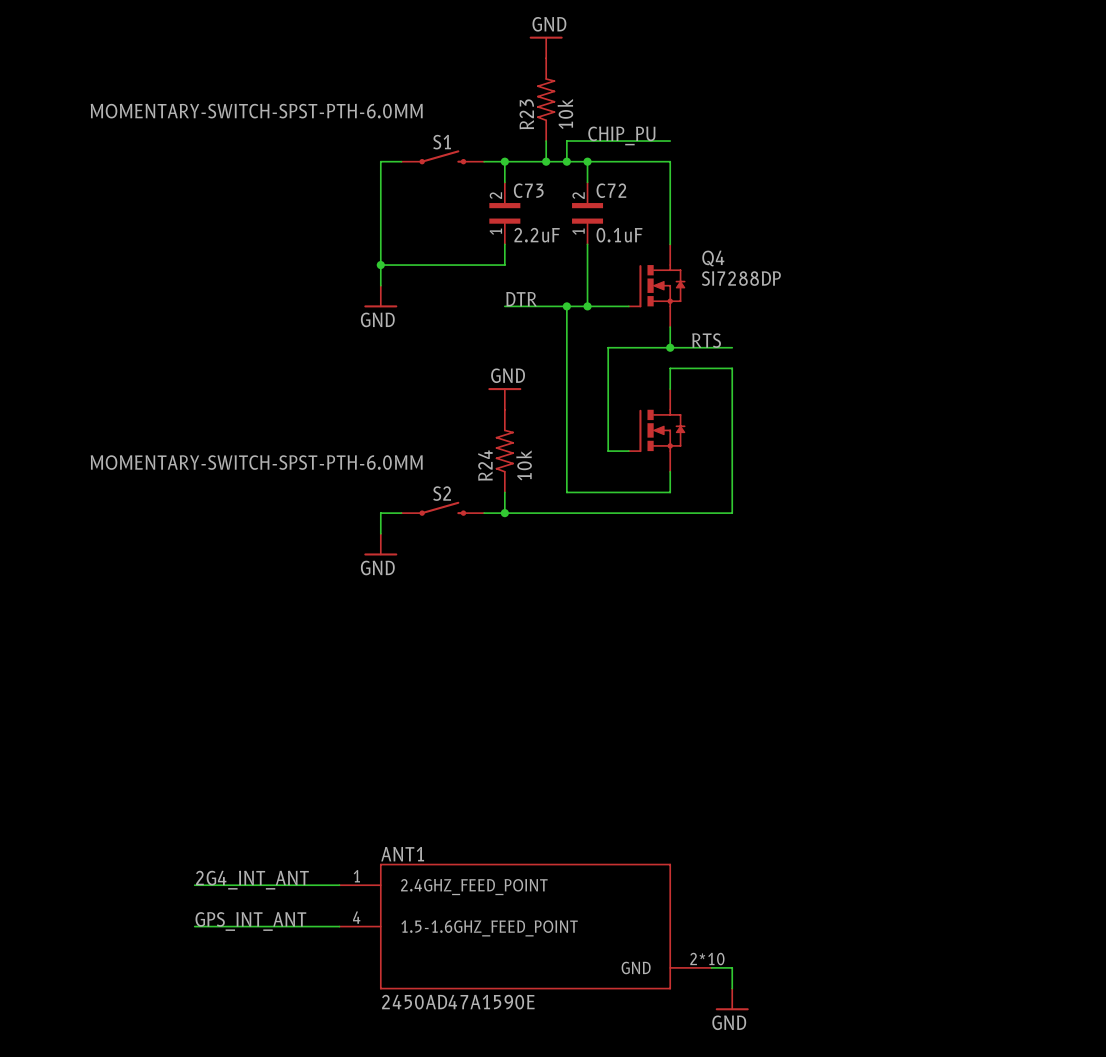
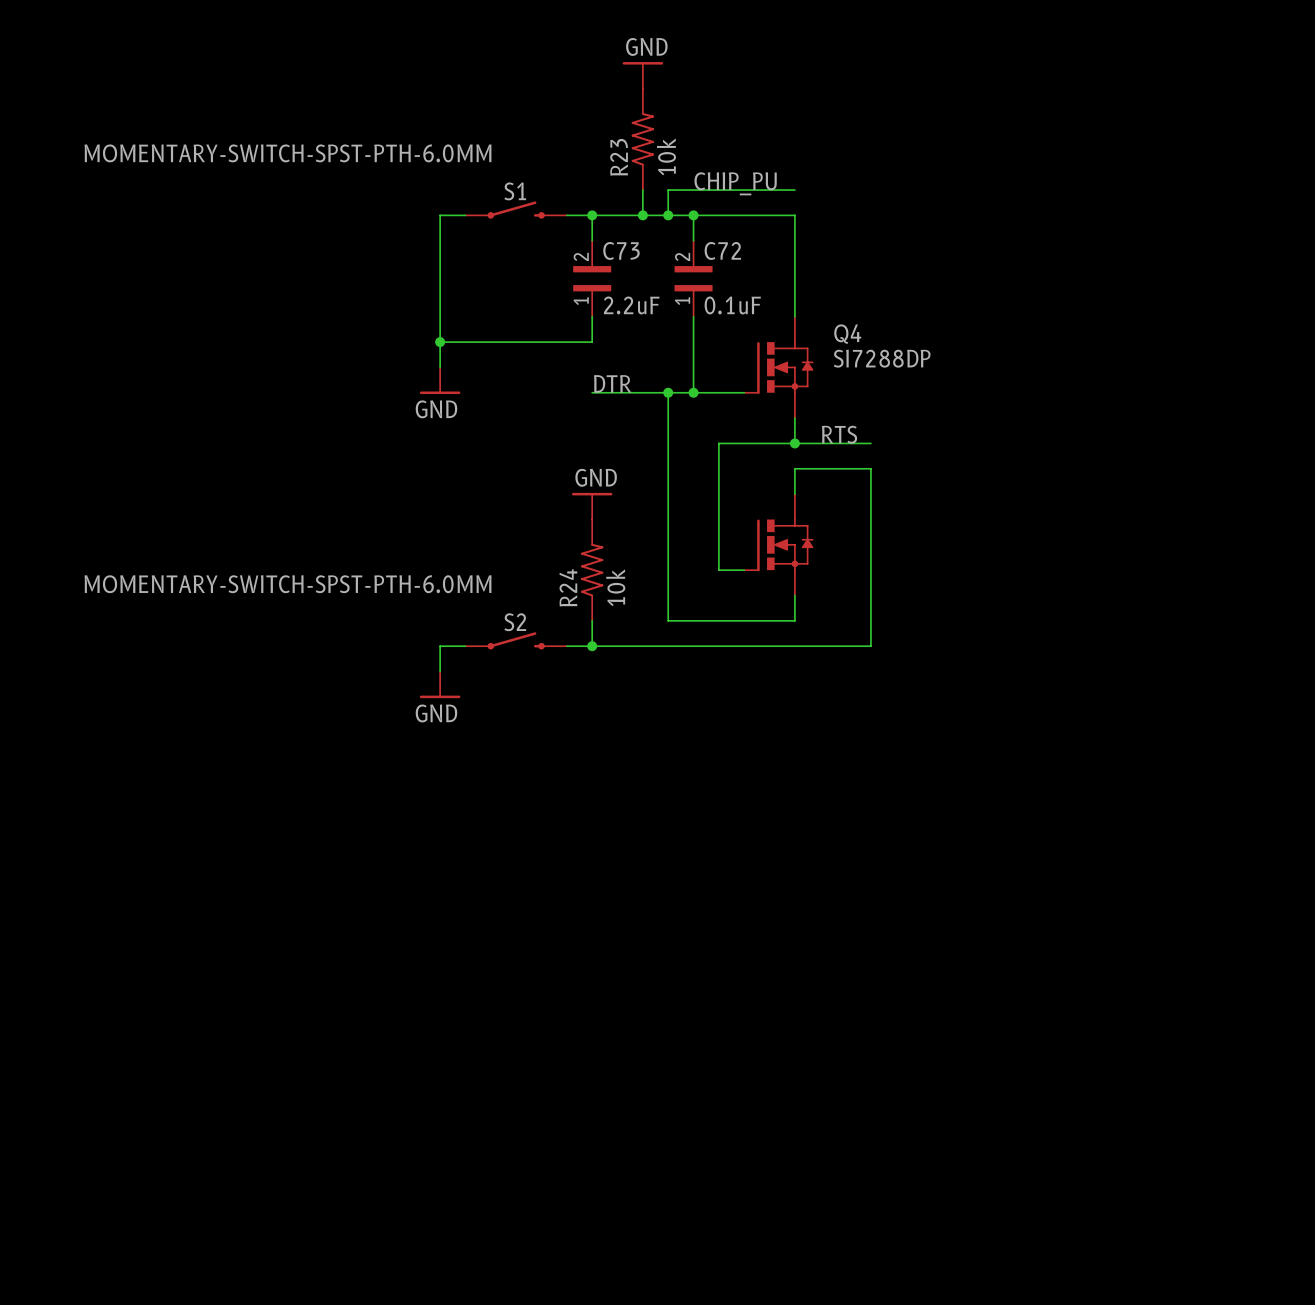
label: 2G4_INT_ANT (252, 880) -> none
wire: (194, 885) (339, 885) -> none
label: GPS_INT_ANT (250, 921) -> none
wire: (194, 926) (339, 926) -> none
ANT1: 2450AD47A1590E (525, 926) -> none
wire: (711, 967) (732, 967) (732, 988) -> none
power symbol: GND (732, 999) -> none

